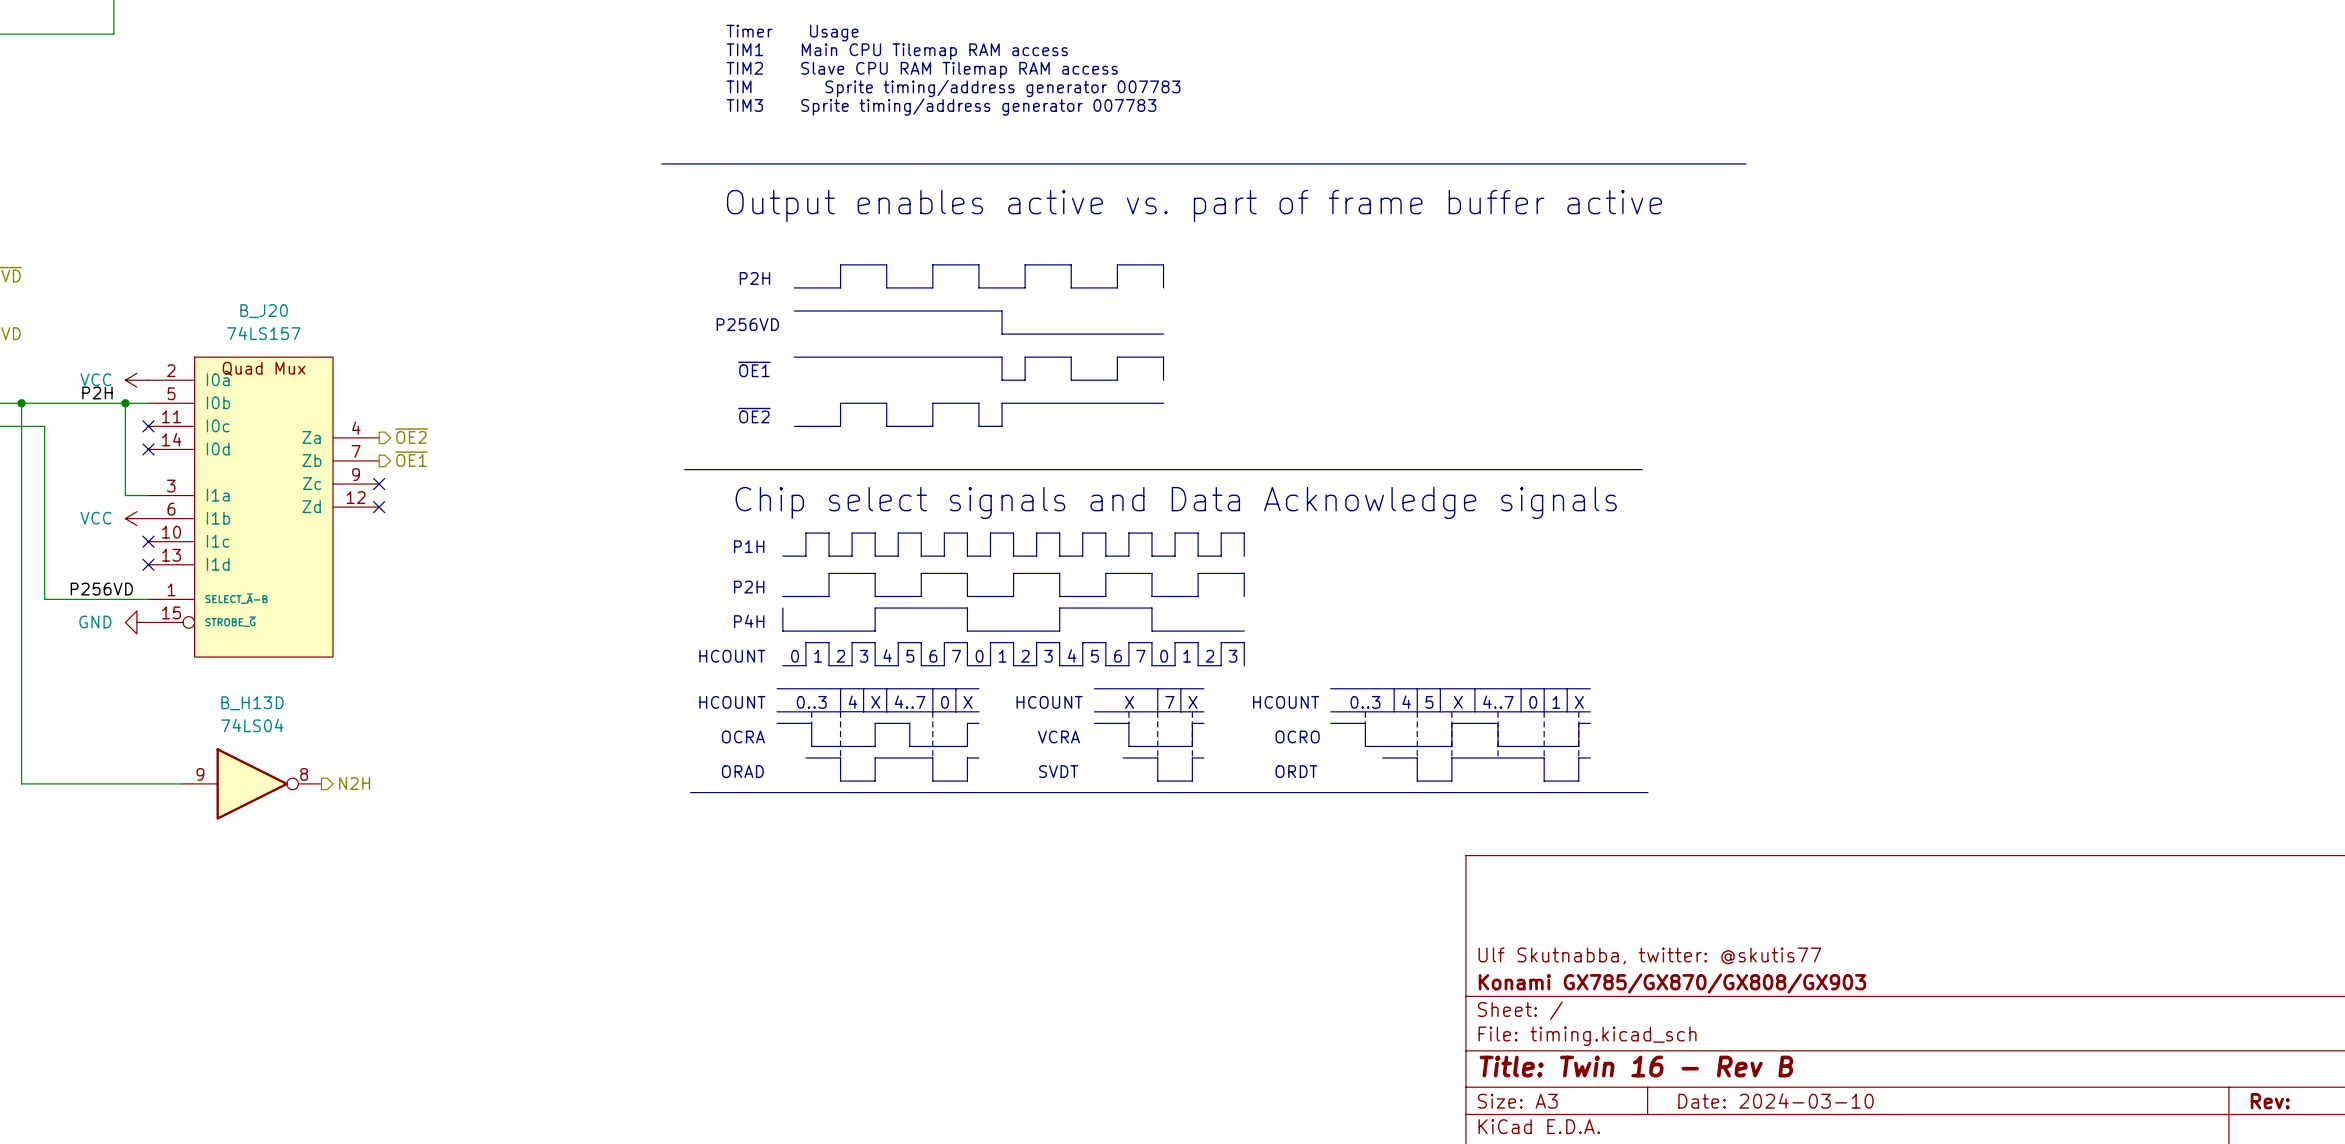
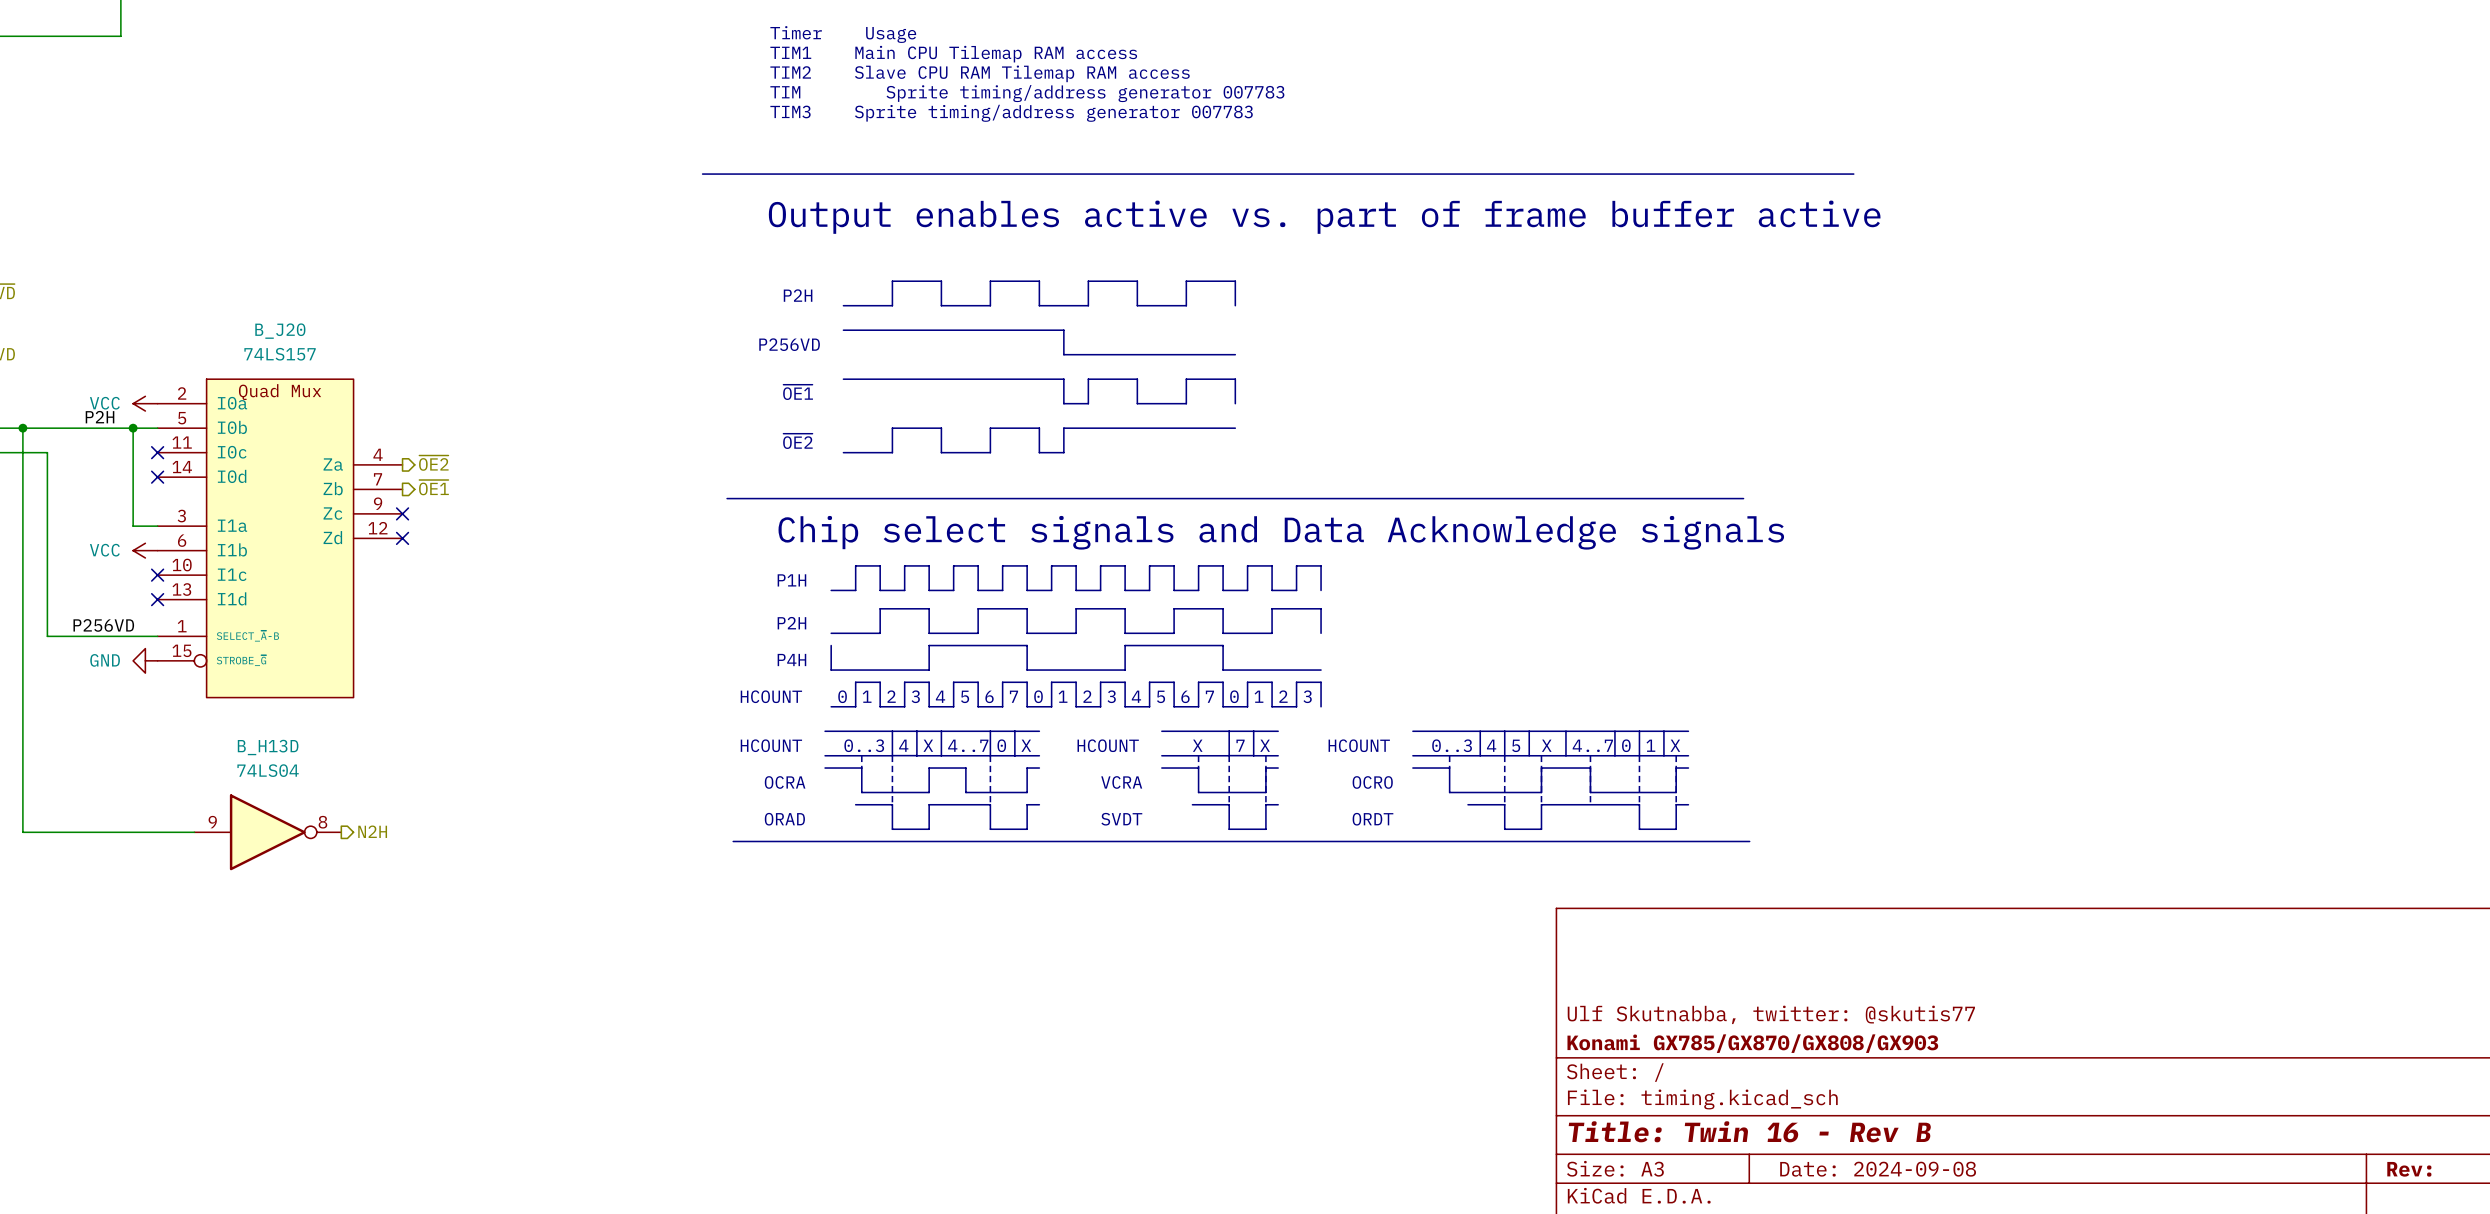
title block: Date: 2024-03-10 (1776, 1100) -> Date: 2024-09-08 (1878, 1169)

